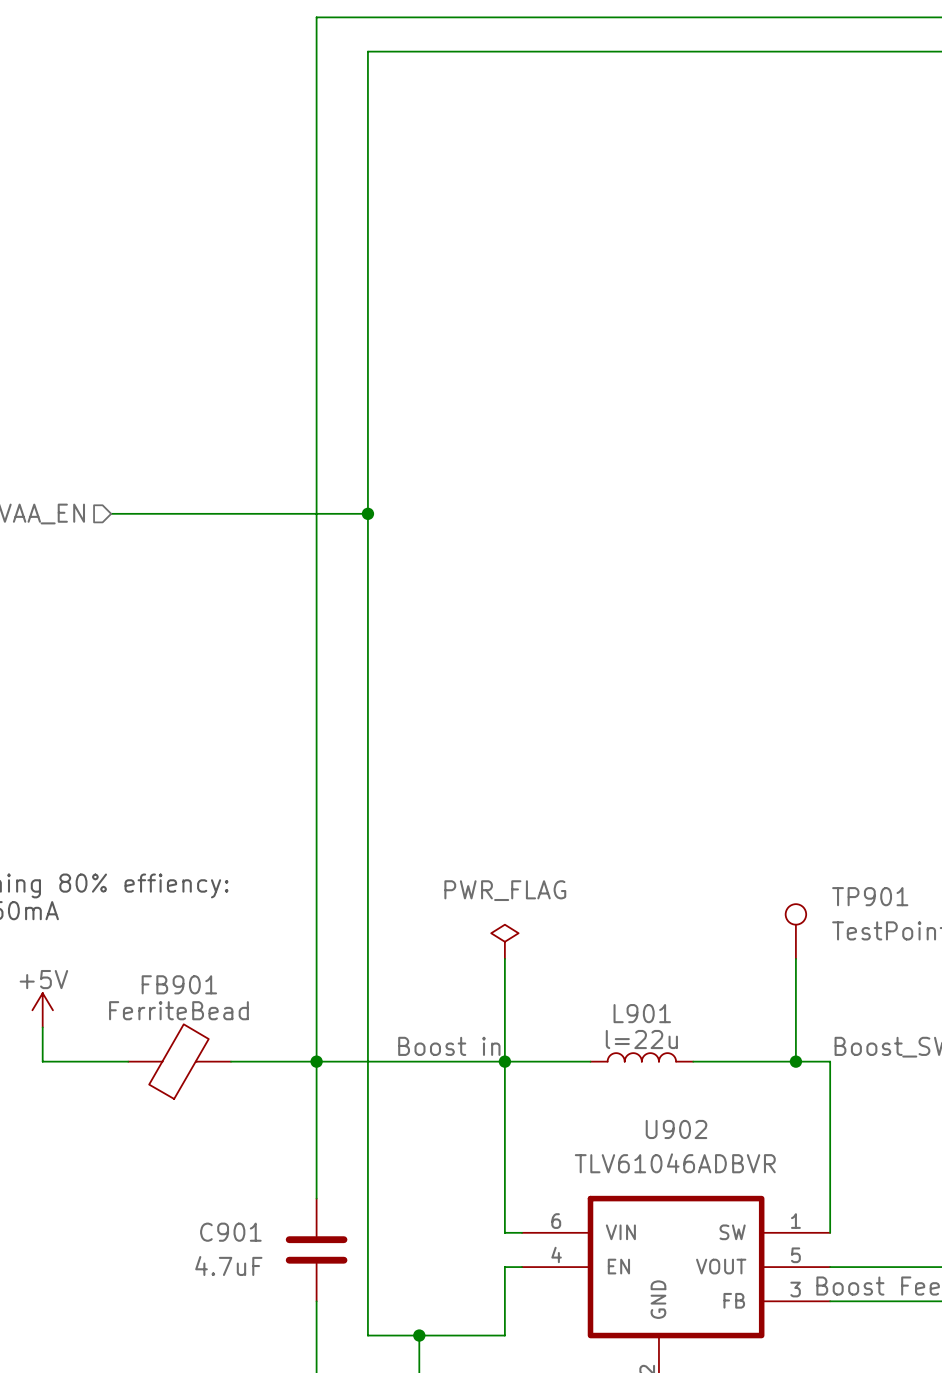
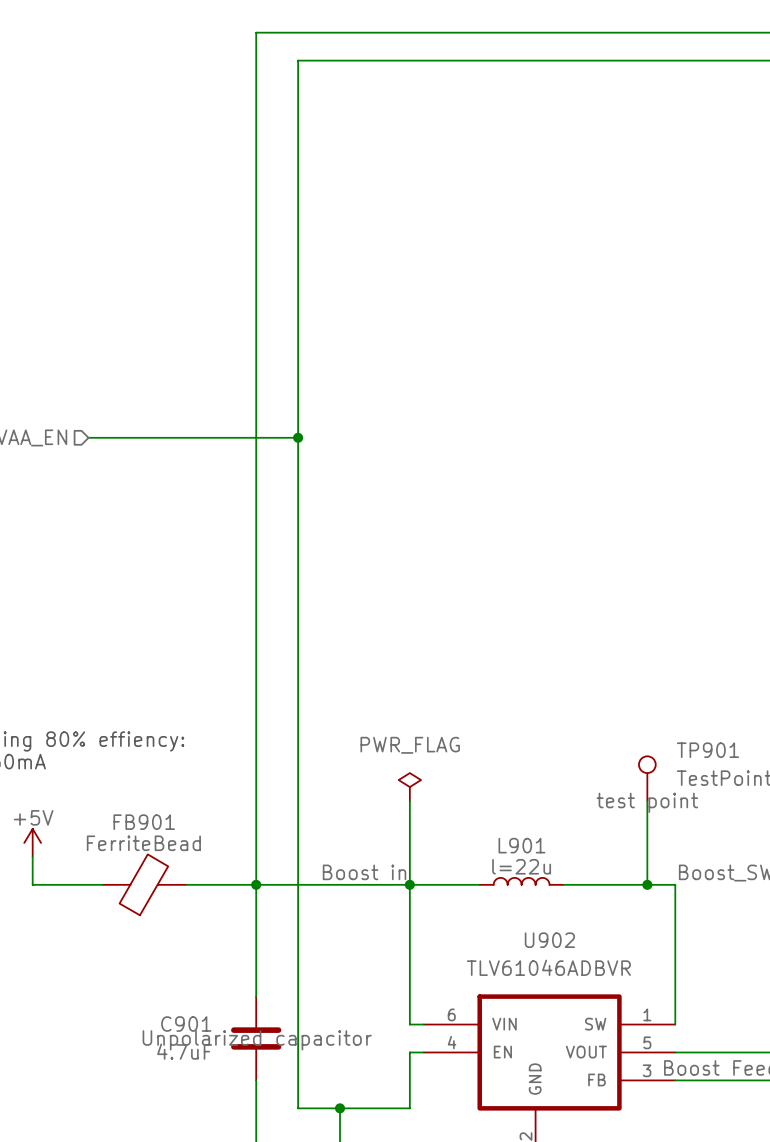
TP901 text: none -> test point (647, 802)
C901 text: none -> Unpolarized capacitor (257, 1040)

